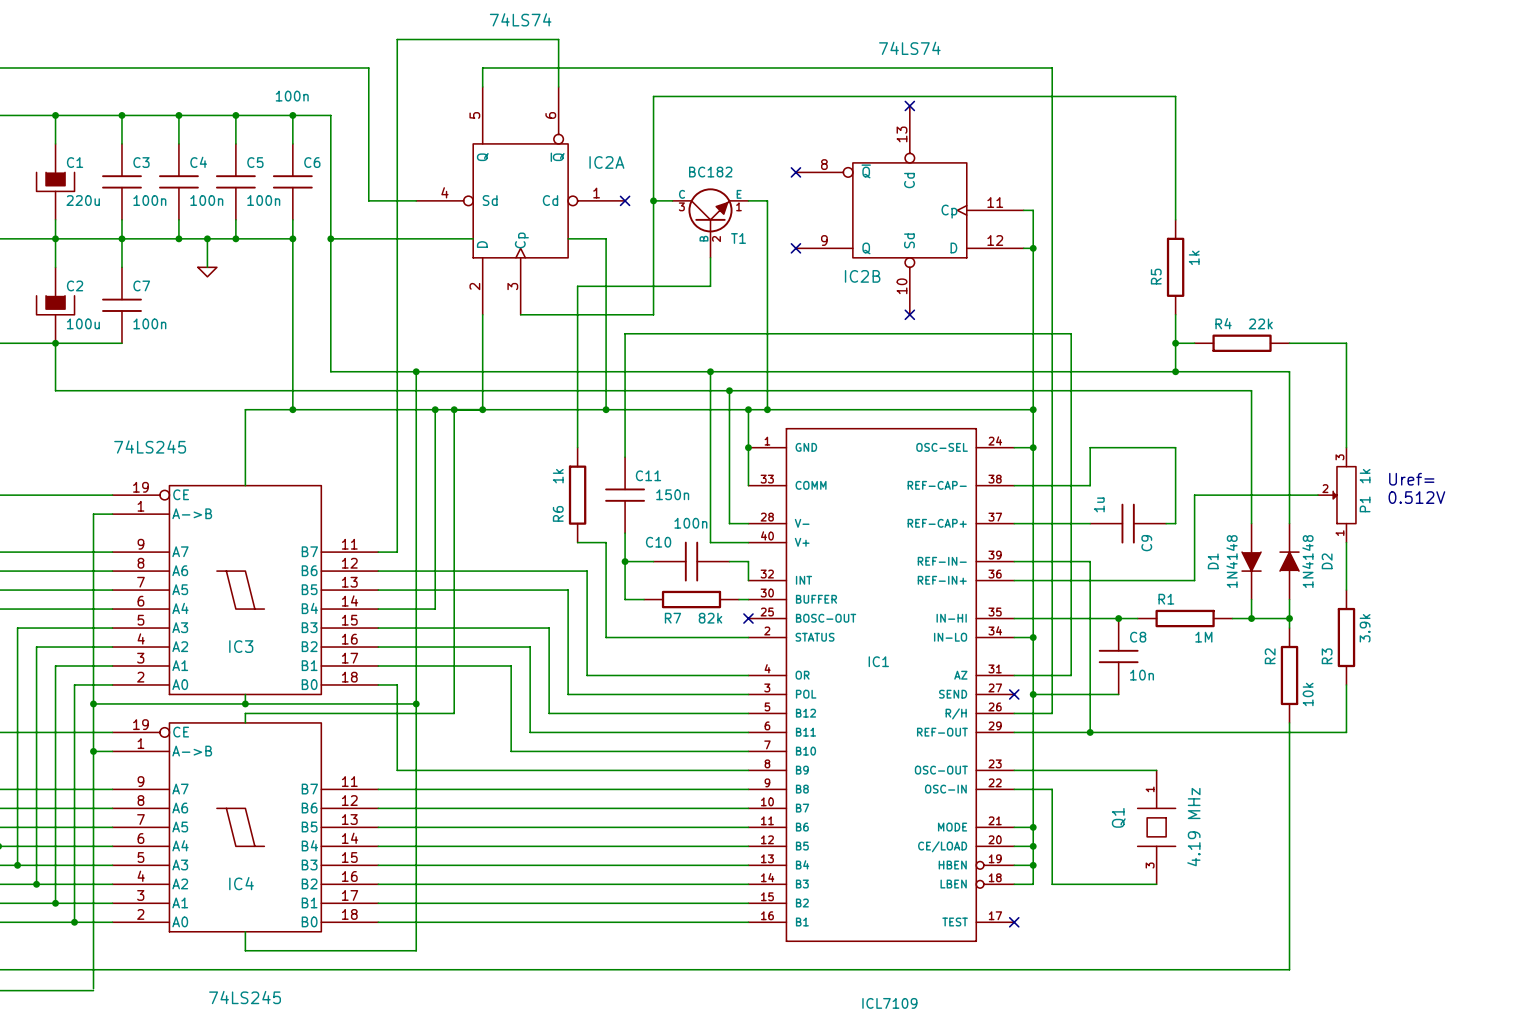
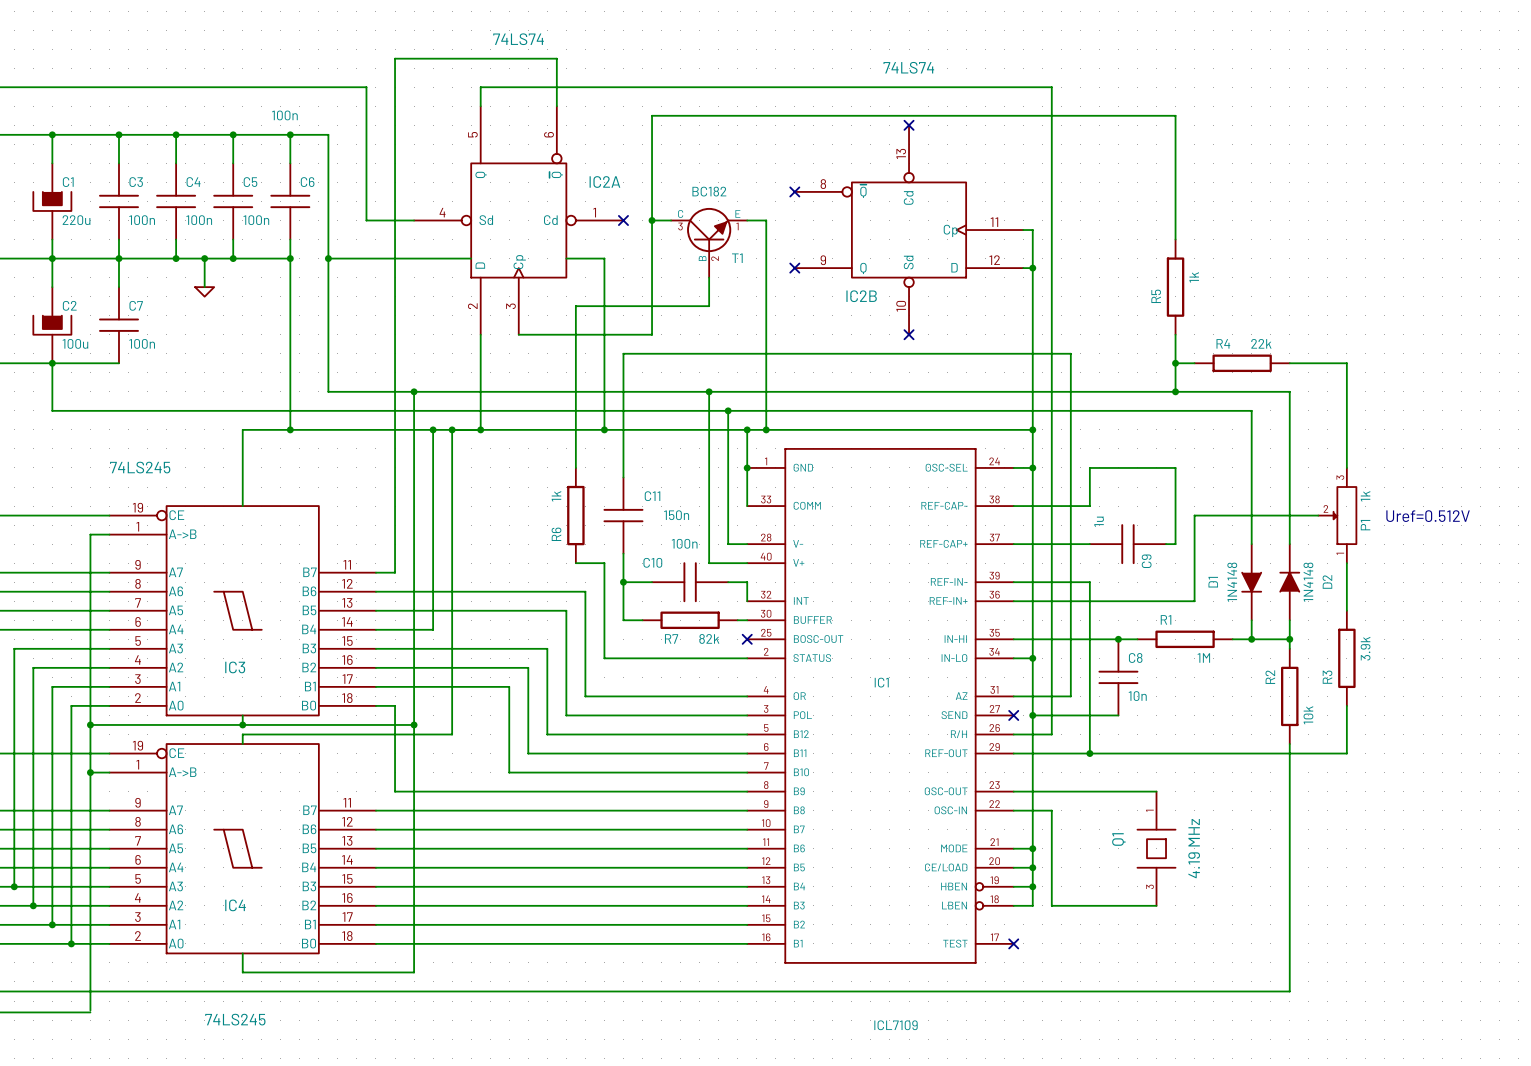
text: Uref= (1411, 479) -> none
text: 0.512V (1416, 497) -> Uref=0.512V (1428, 516)

